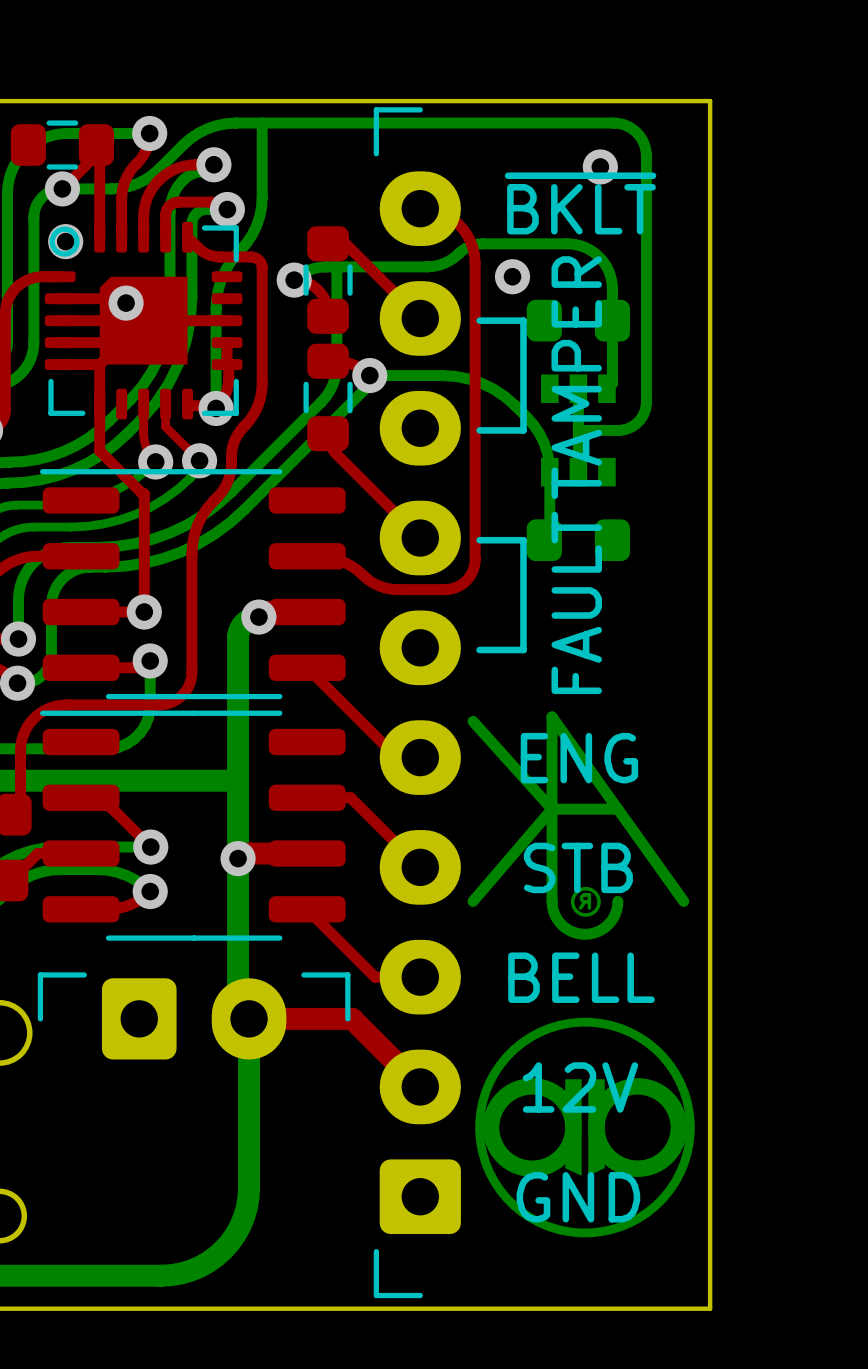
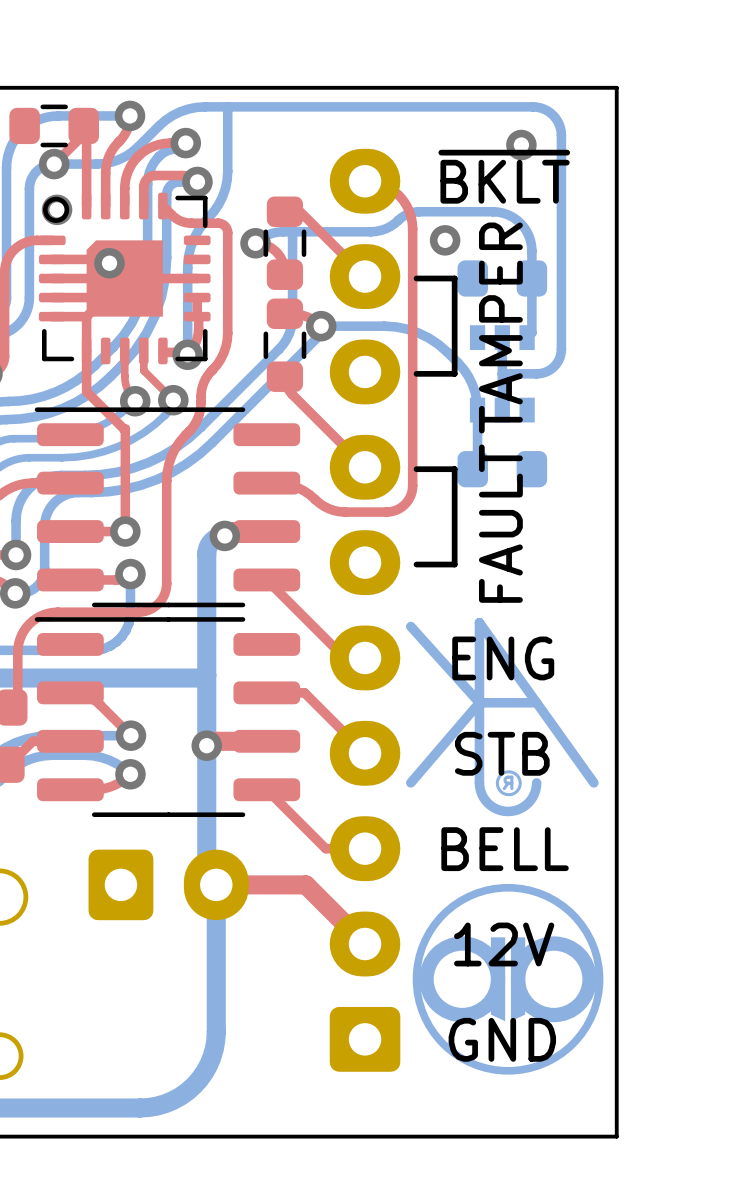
part footprint: [373, 107, 461, 1299] -> [329, 148, 401, 1072]
part footprint: [37, 972, 351, 1060] -> [88, 849, 249, 921]

